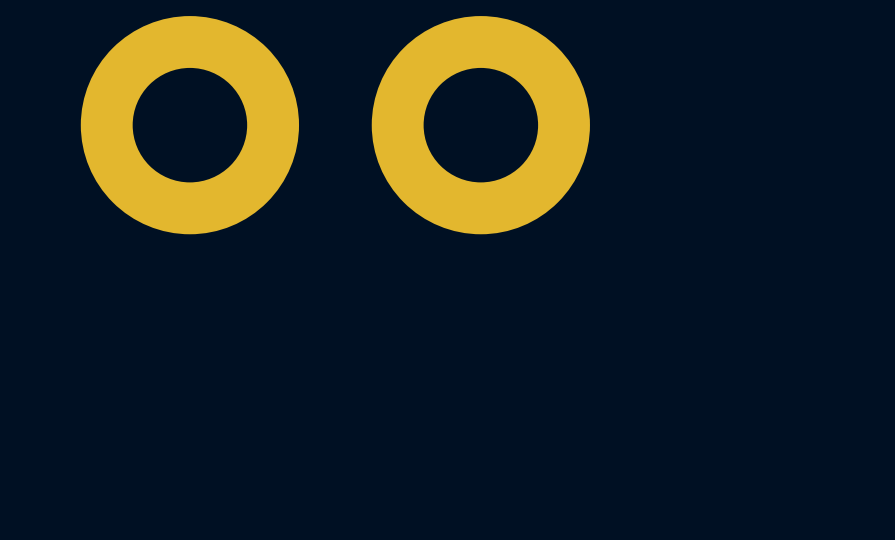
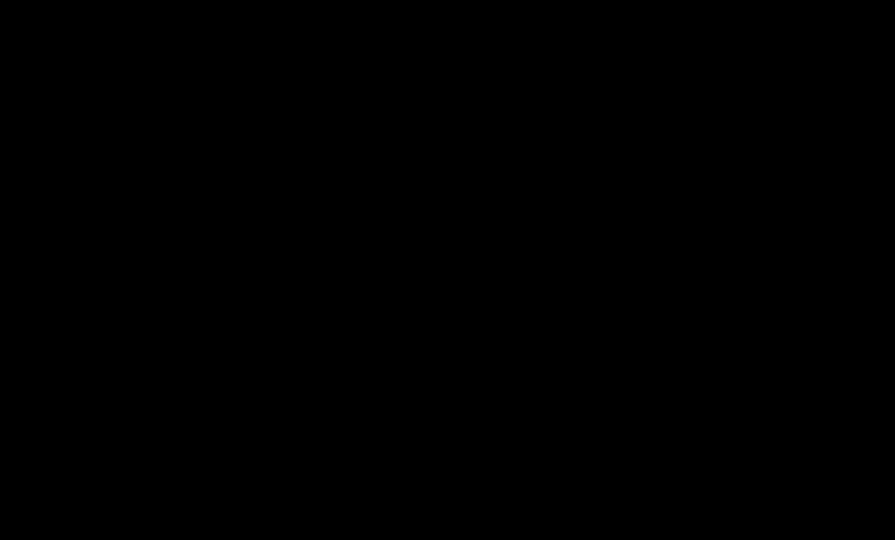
part: (335, 125) -> none

